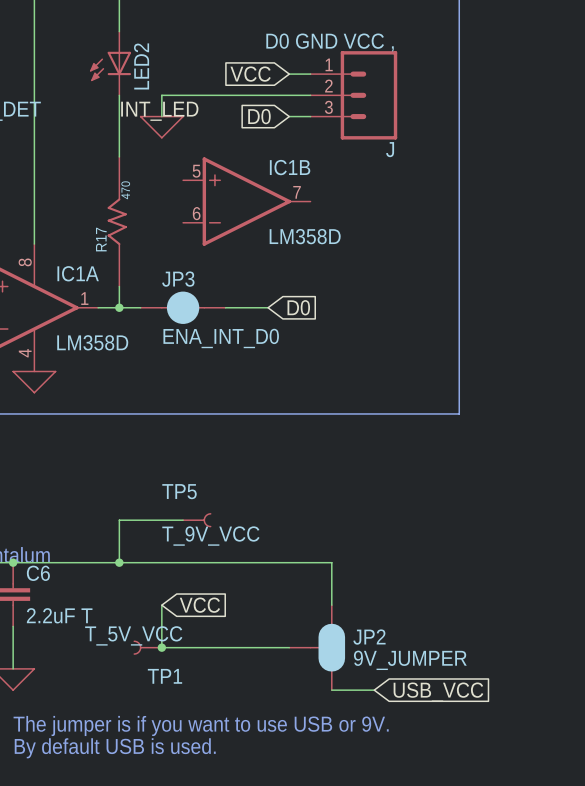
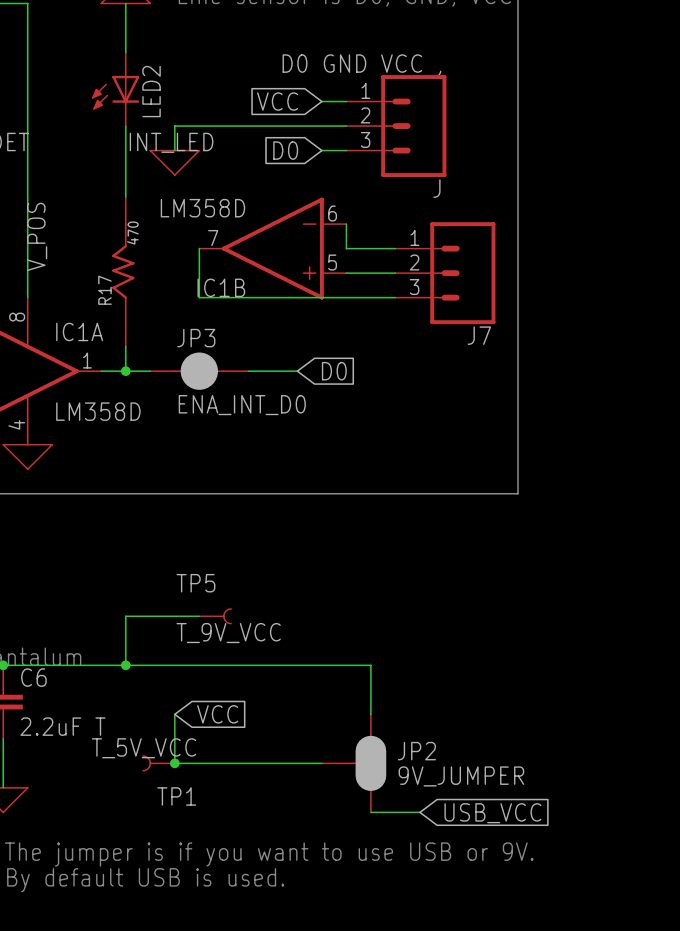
wire: none -> (346, 224) (346, 248) (395, 248)
label: none -> V_POS (37, 236)
wire: none -> (199, 248) (199, 297) (395, 297)
IC1B rotation: 0° (246, 201) -> 180° (272, 248)
wire: none -> (346, 273) (395, 273)
J7: none -> (445, 273)

